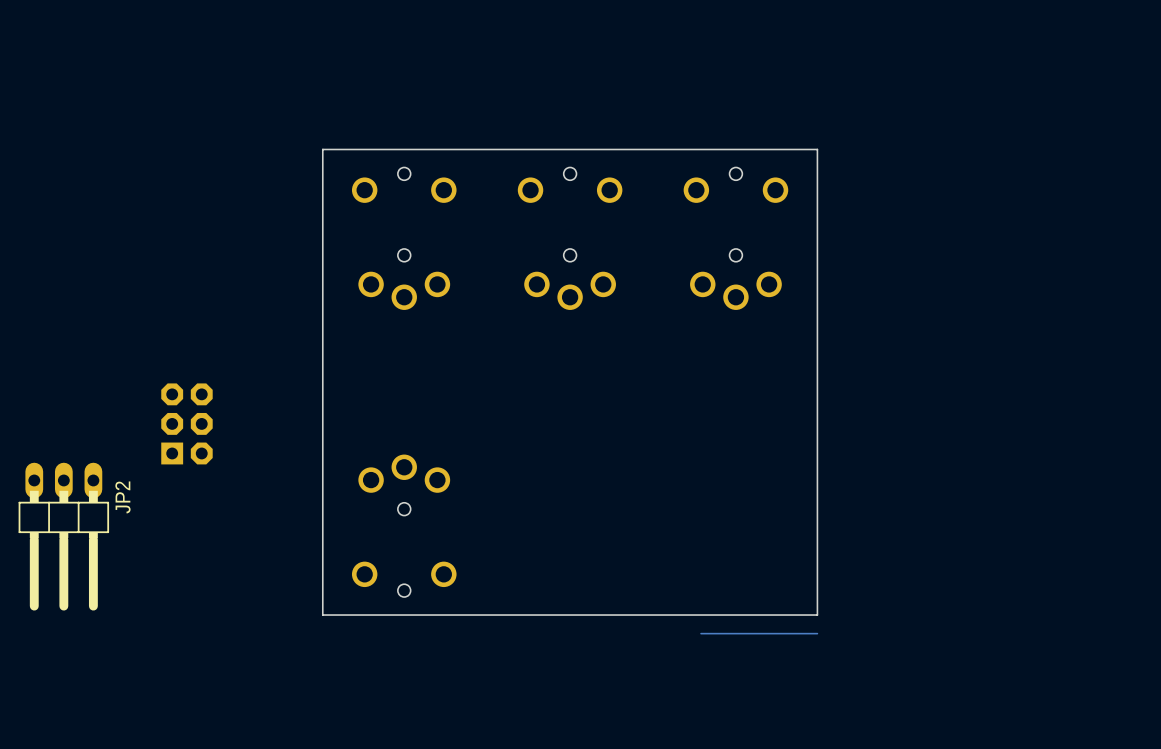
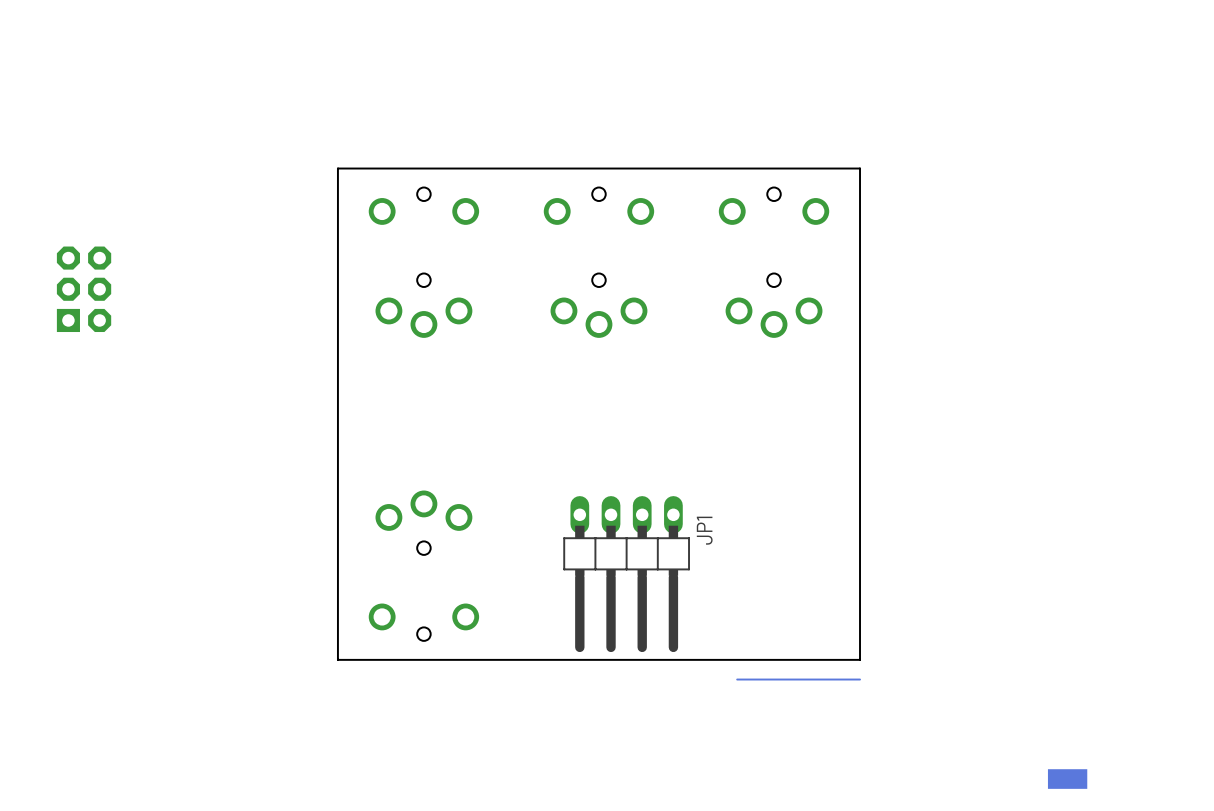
part position: (186, 423) -> (84, 289)
JP1: none -> (626, 574)
JP2: (63, 536) -> none
drawing: none -> [1047, 769, 1088, 789]

